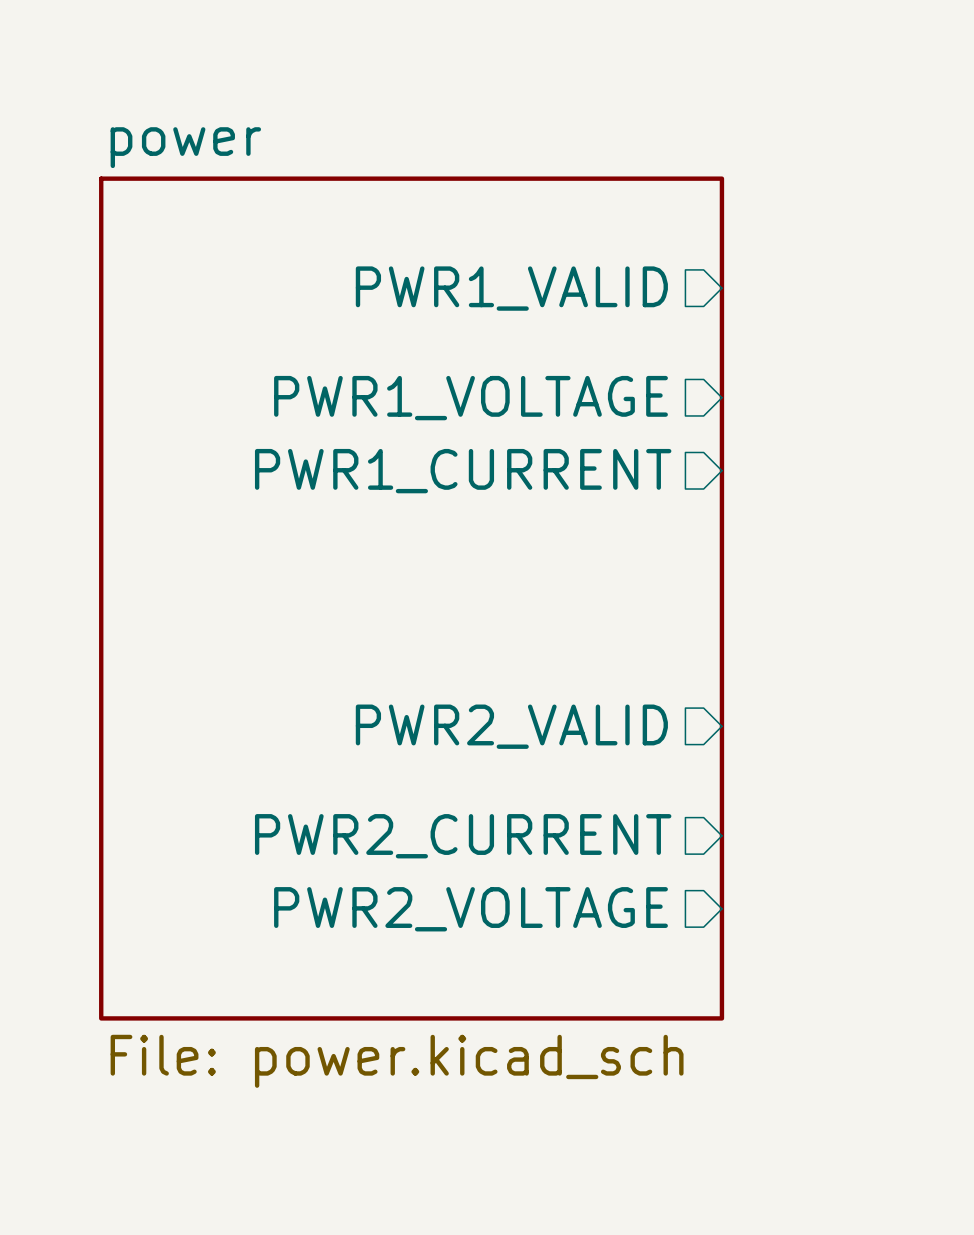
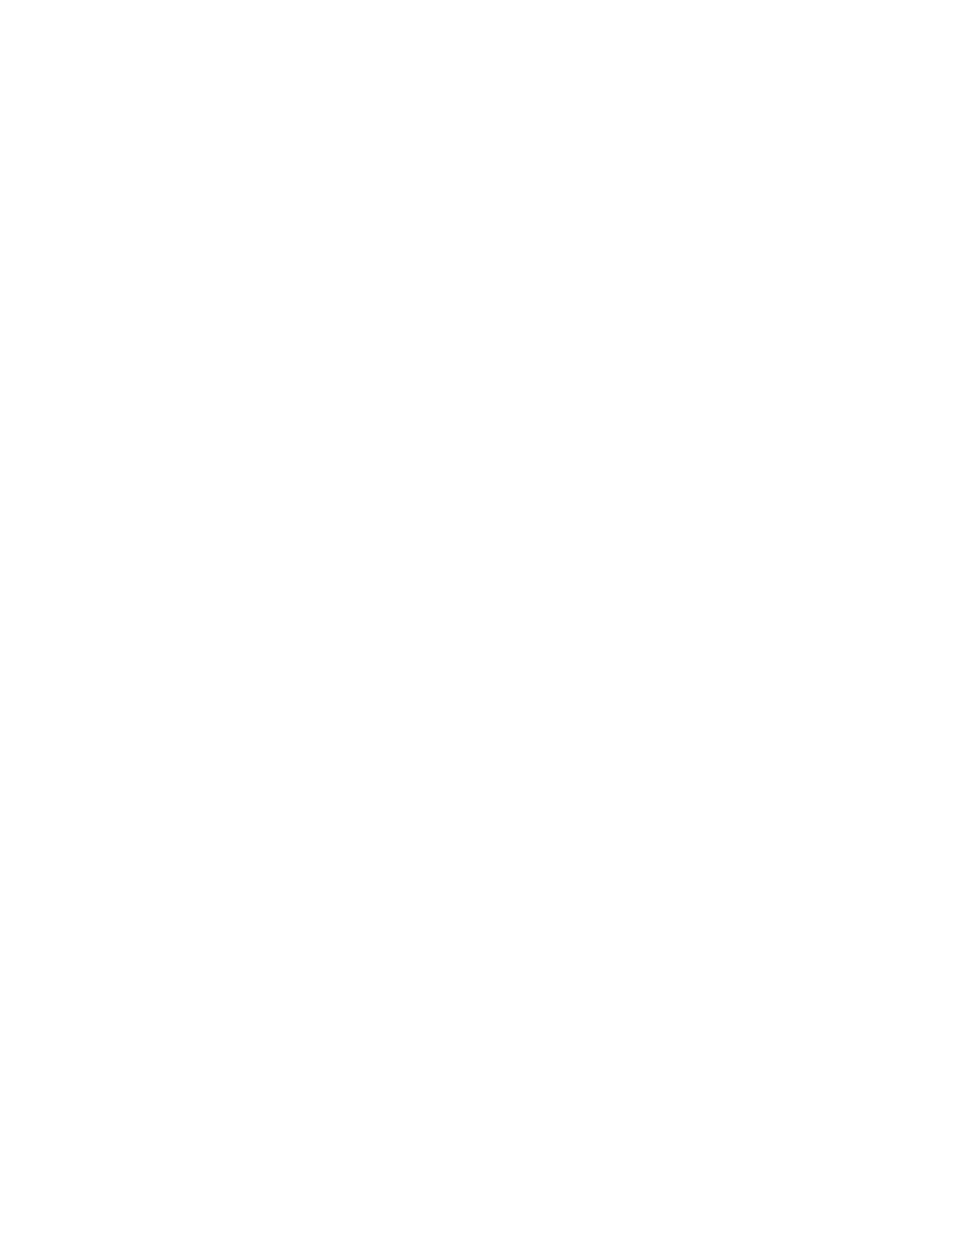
sheet pin: PWR1_VALID (511, 288) -> none
sheet pin: PWR1_VOLTAGE (471, 398) -> none
sheet pin: PWR1_CURRENT (463, 471) -> none
sheet power: File: power.kicad_sch (411, 598) -> none
sheet pin: PWR2_VALID (511, 726) -> none
sheet pin: PWR2_CURRENT (463, 836) -> none
sheet pin: PWR2_VOLTAGE (471, 909) -> none

